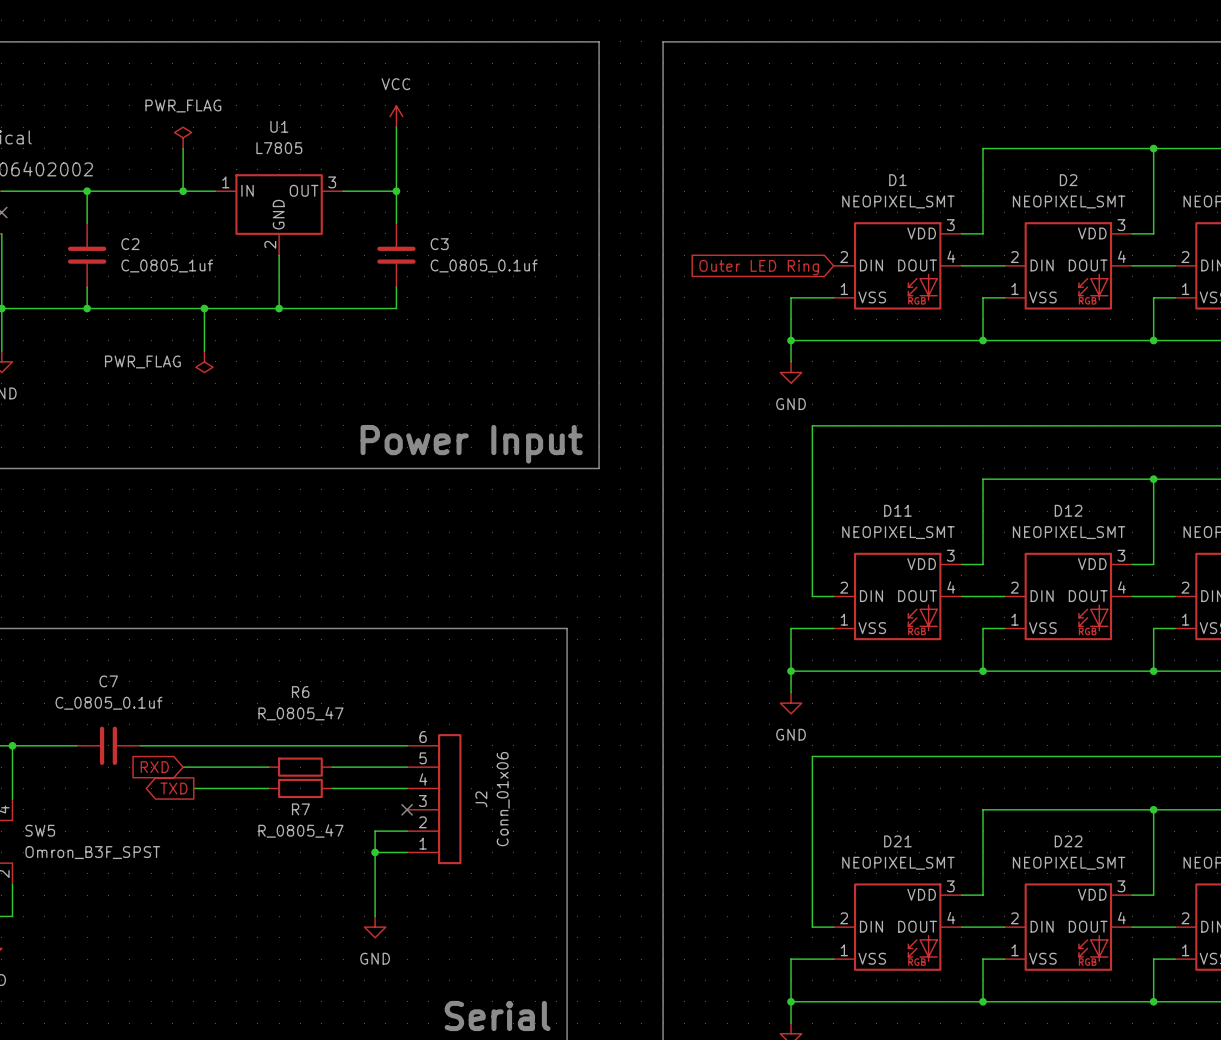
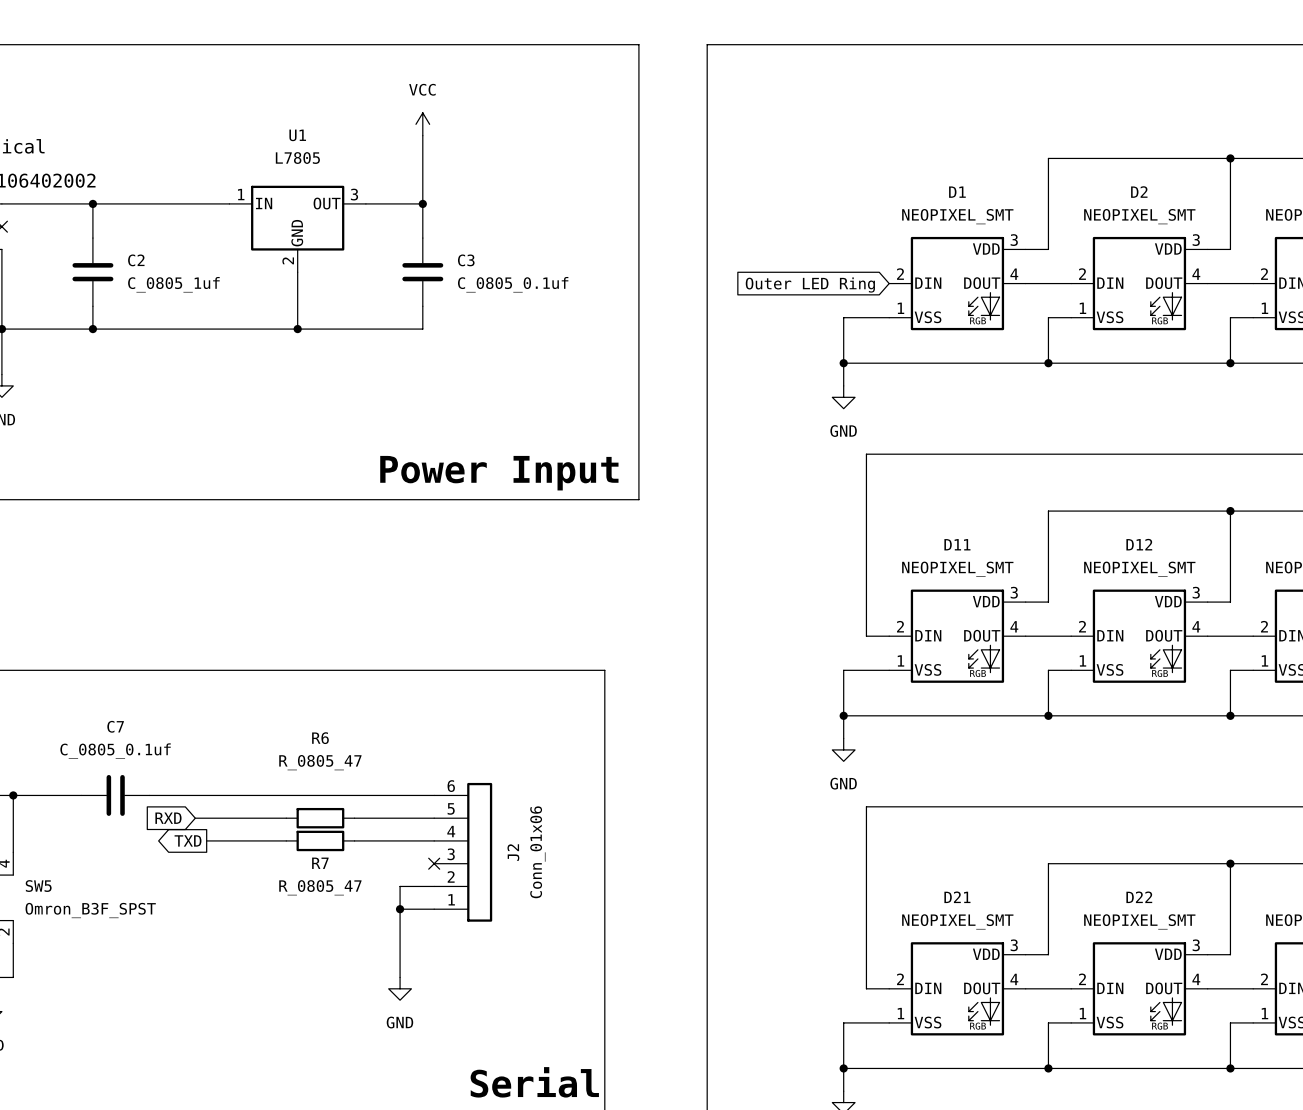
power symbol: PWR_FLAG (183, 137) -> none
wire: (183, 148) (183, 191) -> none
junction: (183, 191) -> none
wire: (204, 308) (204, 351) -> none
junction: (204, 308) -> none
power symbol: PWR_FLAG (204, 361) -> none

